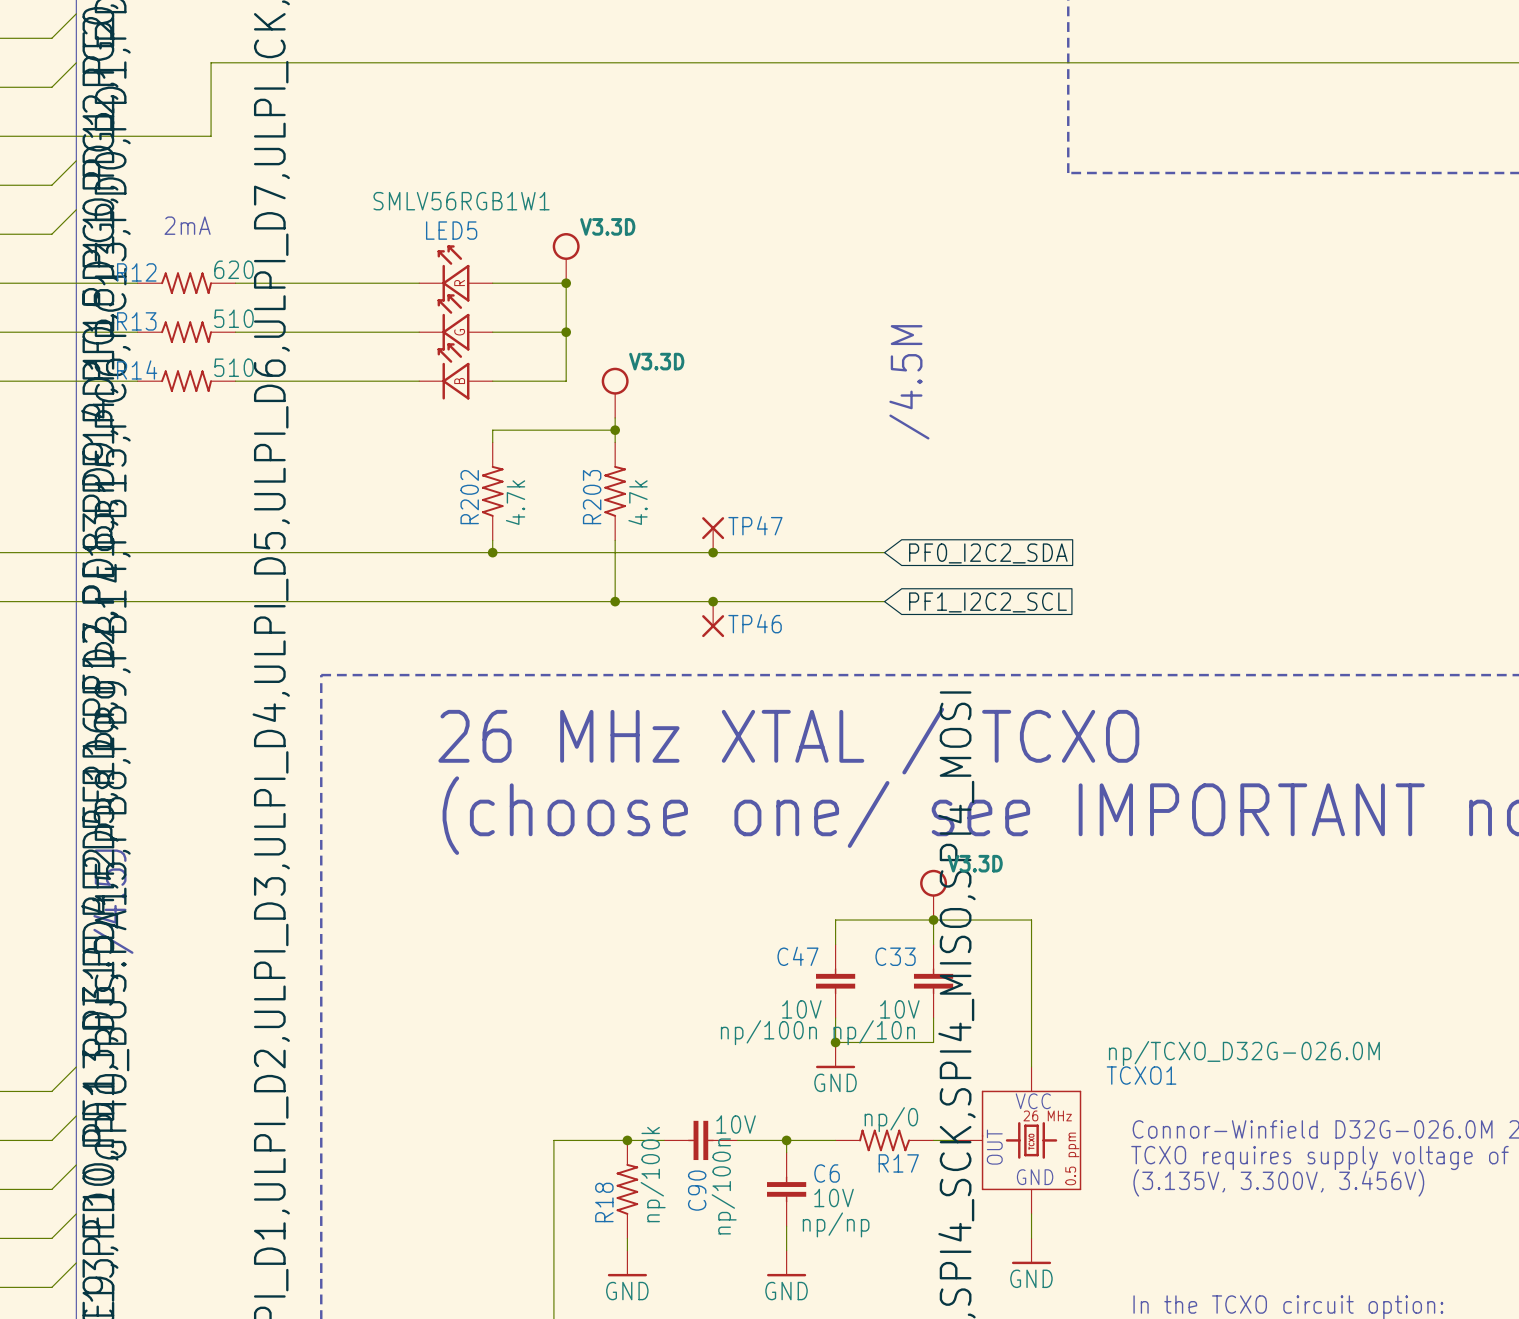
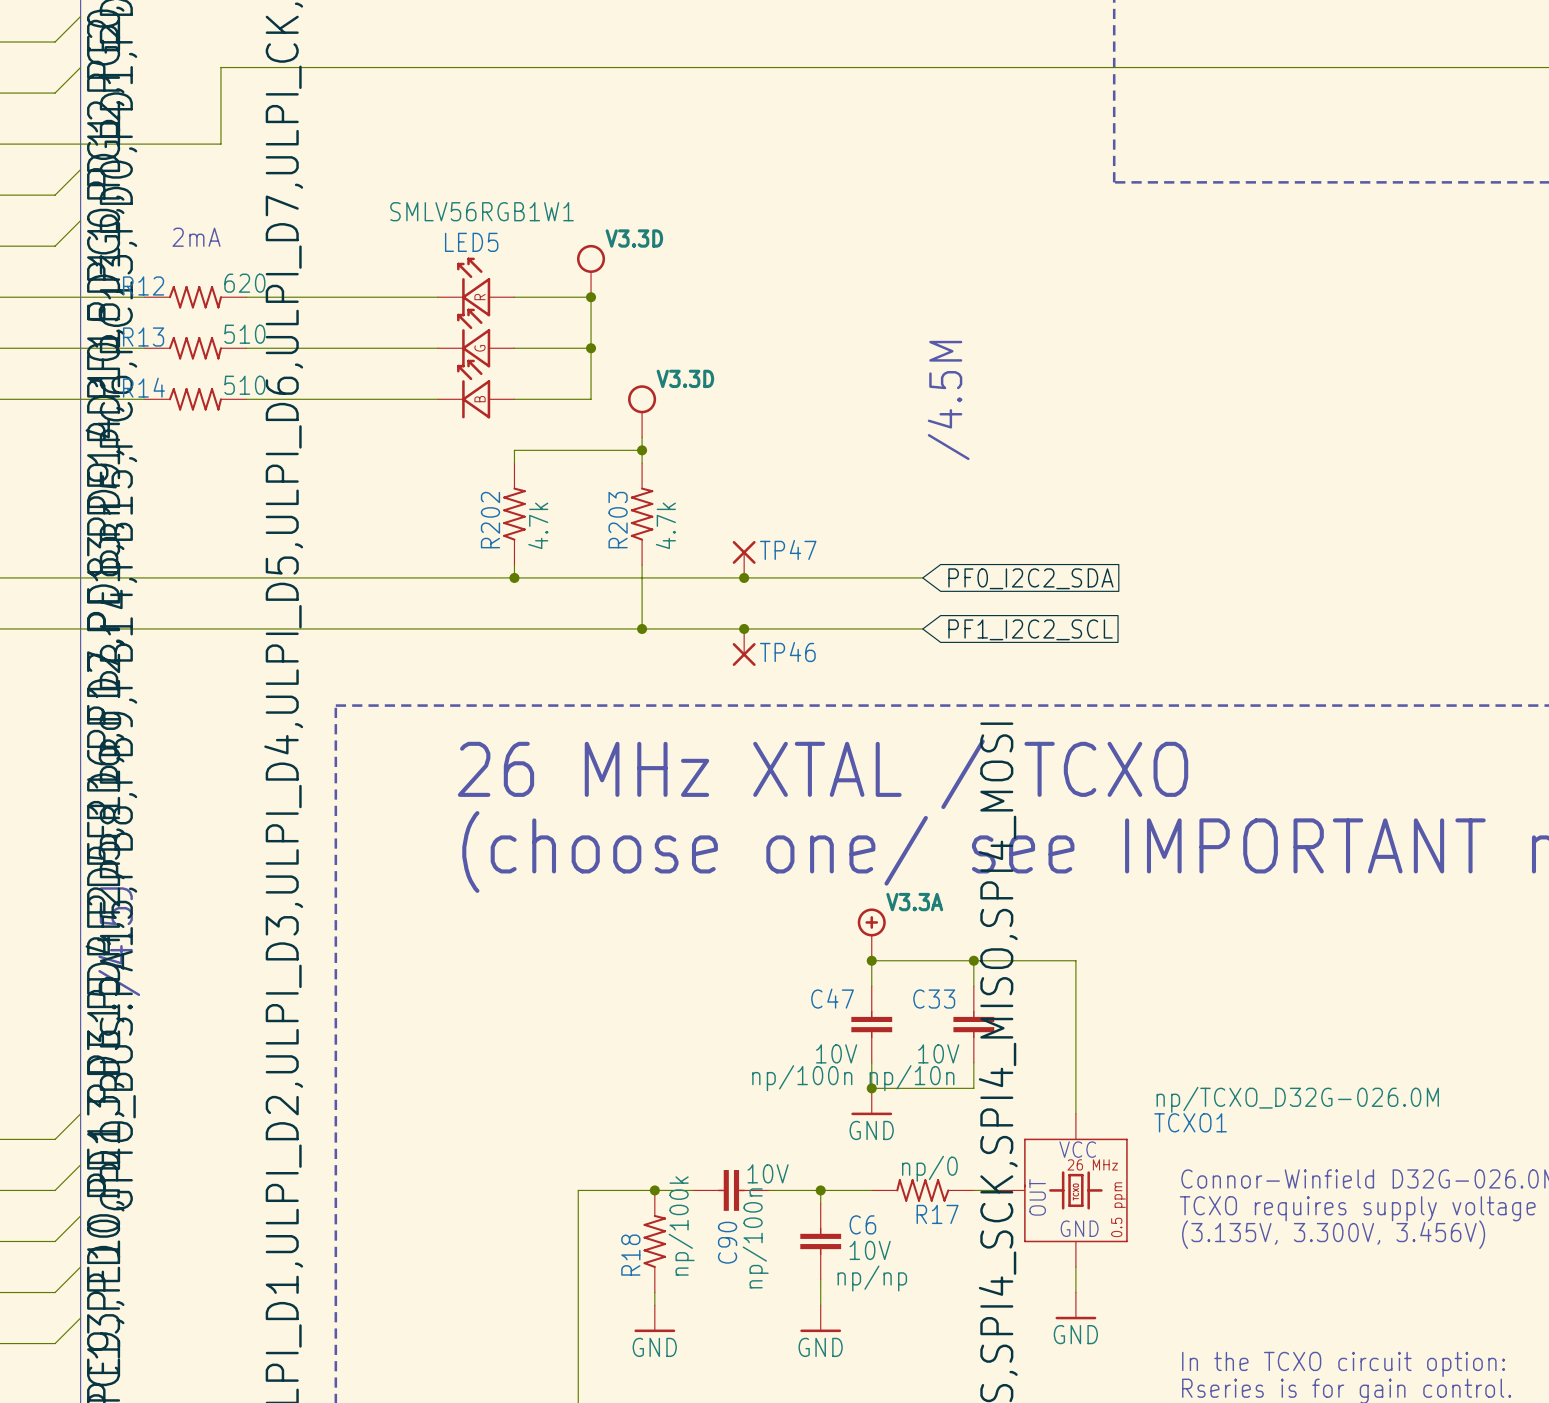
power symbol: none -> V3.3A (871, 934)
power symbol: V3.3D (933, 894) -> none
junction: none -> (871, 960)

